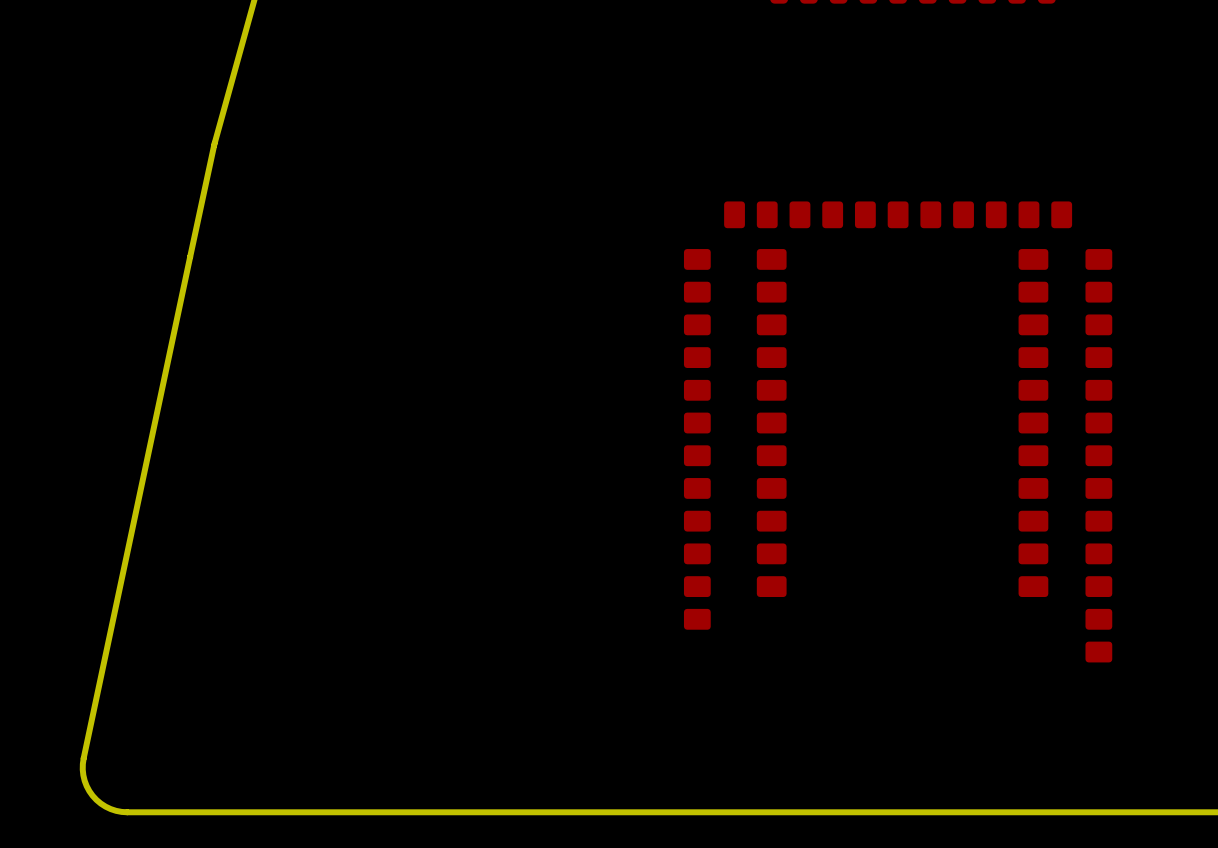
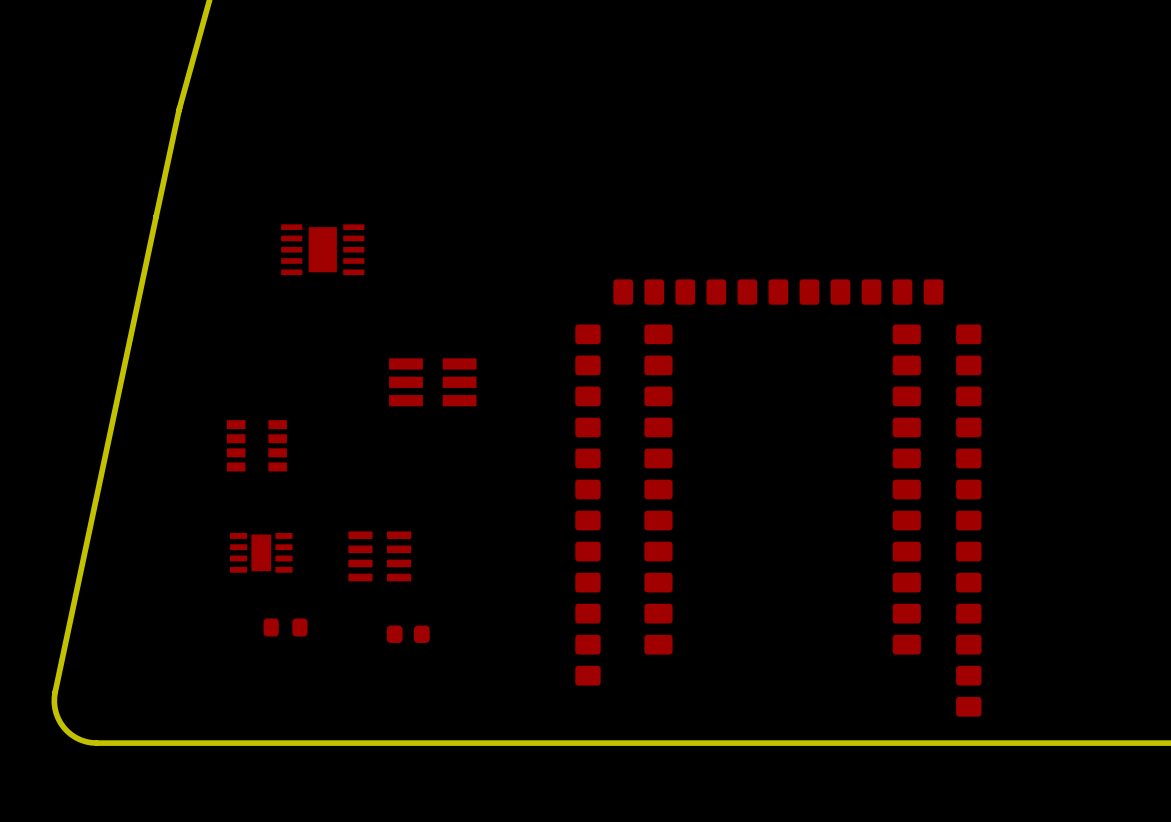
part: none -> (322, 249)
part: none -> (432, 382)
part position: (898, 431) -> (778, 497)
part: none -> (256, 445)
part: none -> (261, 552)
part: none -> (379, 556)
part: none -> (285, 627)
part: none -> (408, 634)

